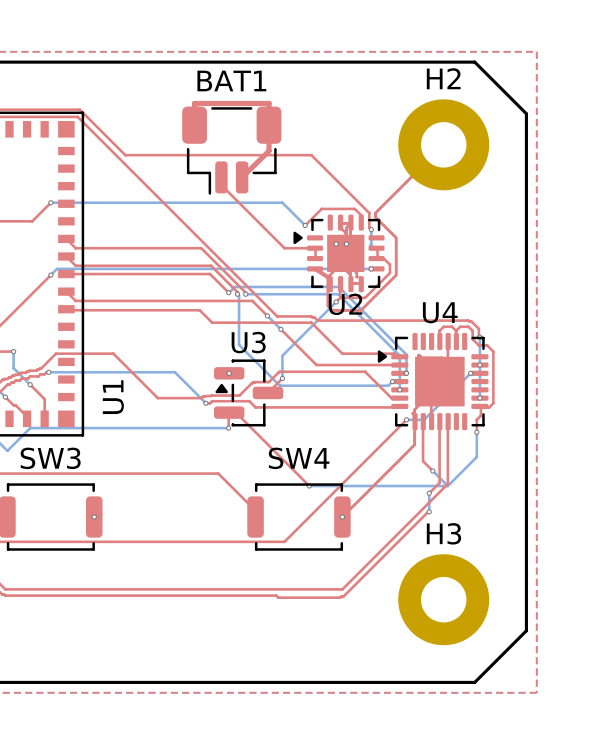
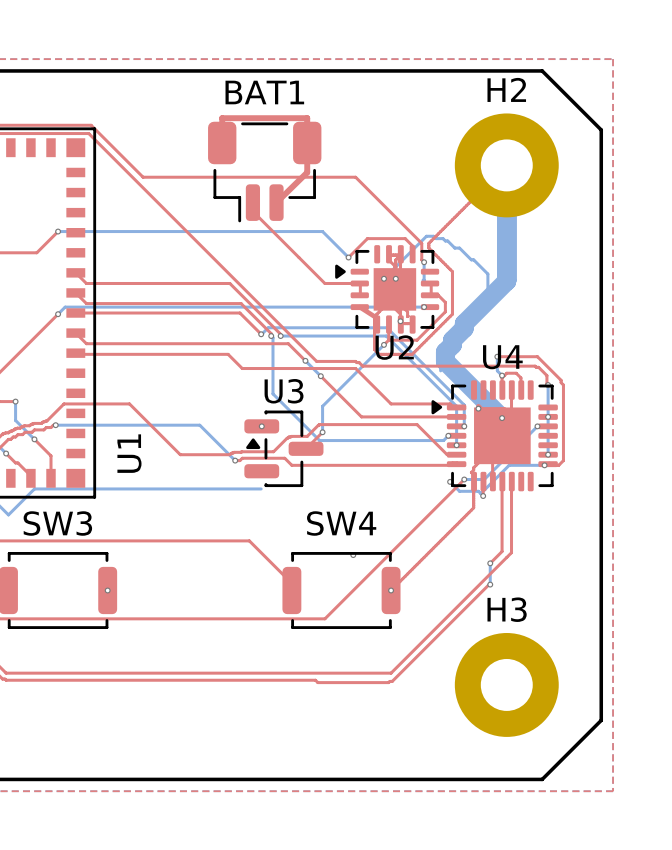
bottom track: none -> (506, 165) (506, 281) (464, 323) (464, 328) (452, 340) (452, 344) (445, 351) (445, 361) (502, 418)
bottom track: none -> (383, 278) (426, 236) (443, 238) (454, 248) (459, 248) (487, 274) (487, 297) (471, 314) (471, 318) (459, 330) (459, 335) (445, 349) (445, 356) (440, 361) (440, 370)
via: none -> (400, 321)
bottom track: none -> (497, 356) (497, 370) (502, 375)
via: none -> (497, 356)
via: none -> (502, 375)
top track: (456, 330) (460, 326) (468, 326) (472, 330) (472, 339) (478, 345) (487, 345) (493, 351) -> (497, 356) (537, 356) (561, 380) (563, 385) (563, 401)
via: none -> (478, 408)
via: none -> (502, 418)
top track: (480, 405) (480, 415) (476, 419) (476, 432) -> none
bottom track: none -> (544, 465) (509, 465) (480, 493)
bottom track: none -> (450, 481) (459, 491) (478, 491) (483, 496)
via: none -> (450, 481)
top track: (228, 428) (228, 413) (234, 411) (309, 486) -> none
via: (228, 428) -> none
bottom track: (476, 432) (476, 457) (447, 486) -> none
via position: (476, 432) -> (544, 465)
top track: (423, 434) (423, 461) (432, 471) -> none
via: none -> (483, 496)
bottom track: (432, 471) (447, 486) -> none
via: (432, 471) -> none
bottom track: (309, 486) (447, 486) -> none

